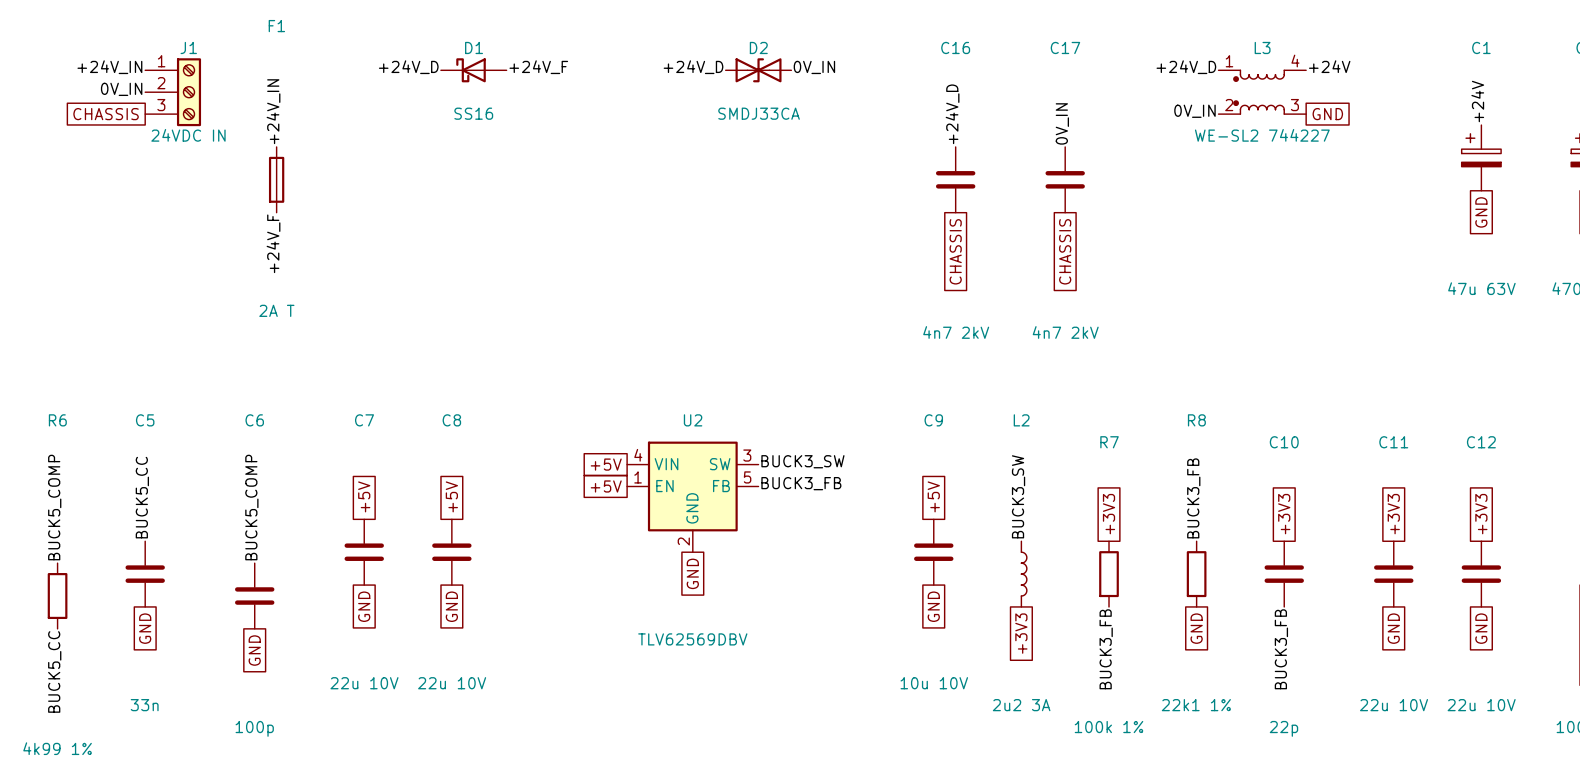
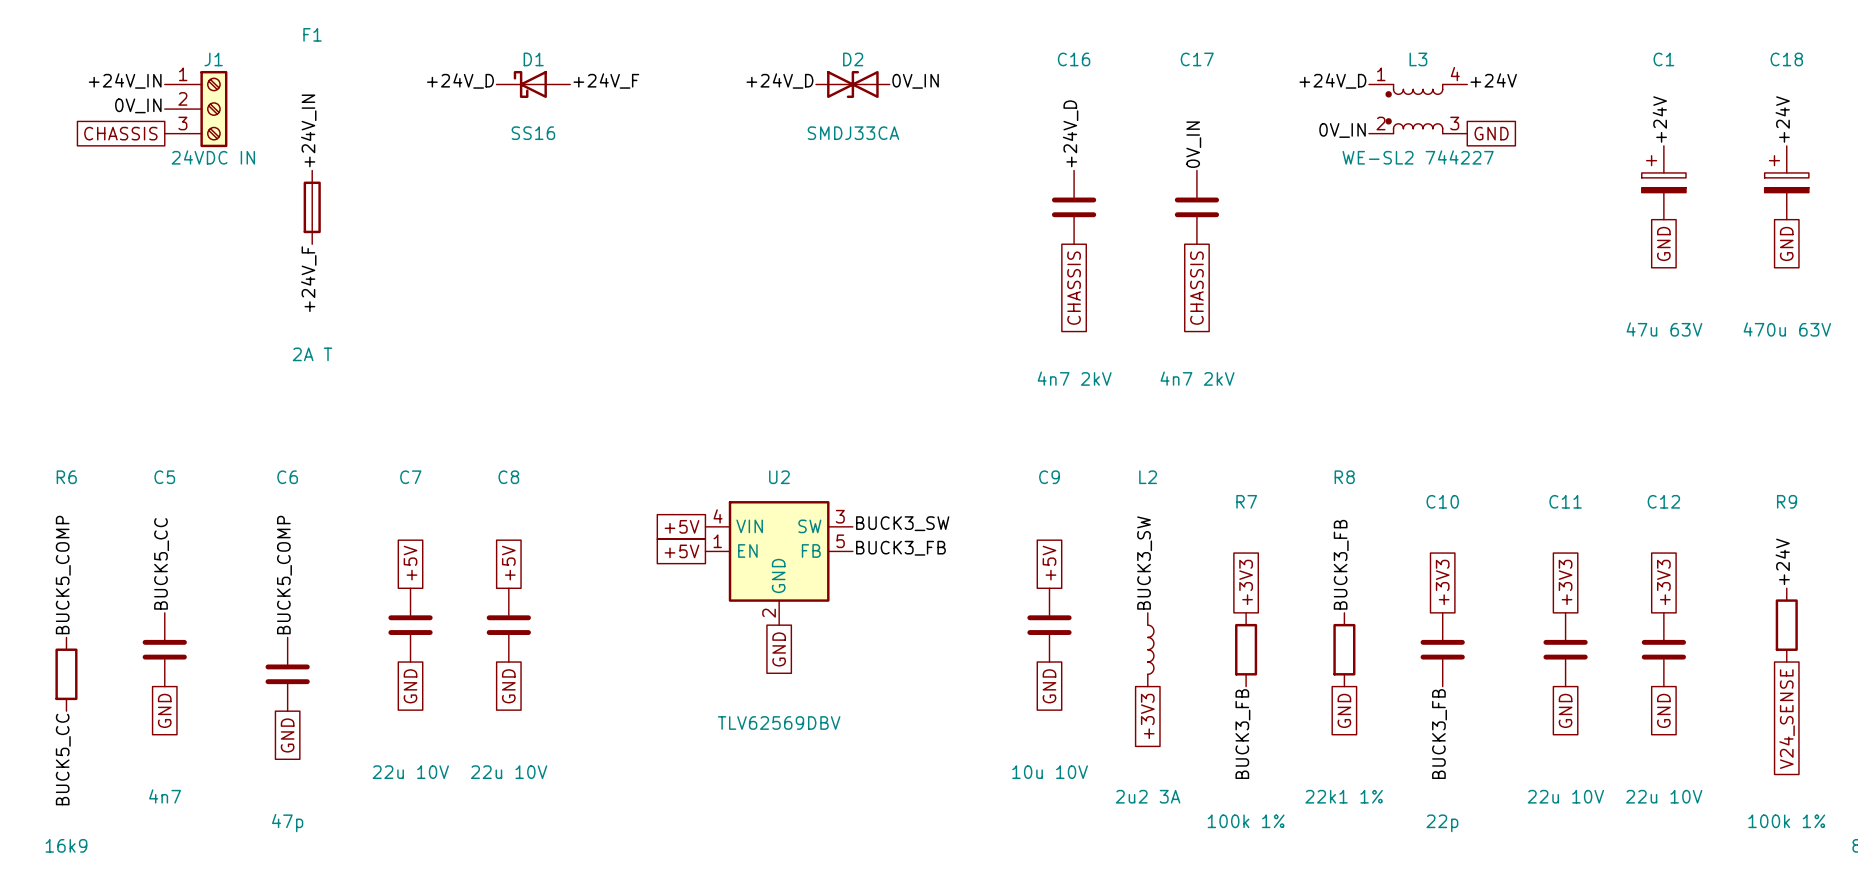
C5 value: 33n (144, 705) -> 4n7 (165, 796)
C6 value: 100p (254, 728) -> 47p (287, 823)
R6 value: 4k99 1% (57, 748) -> 16k9 (66, 845)

